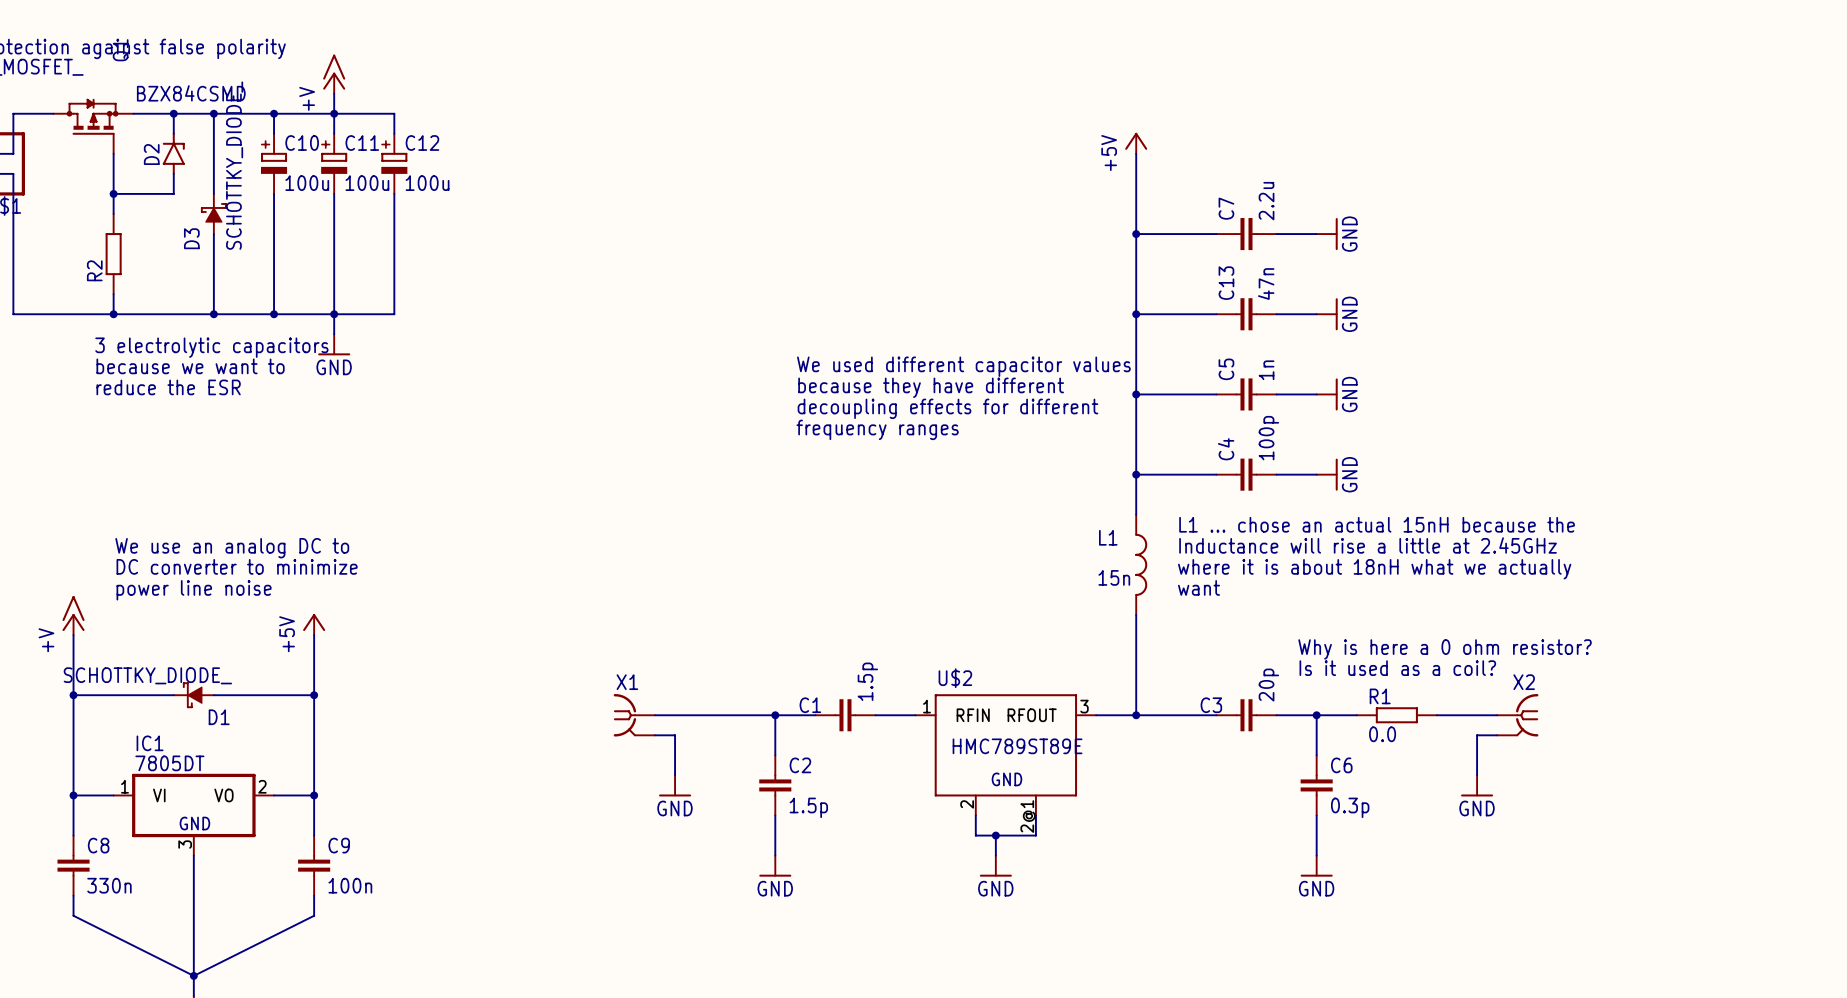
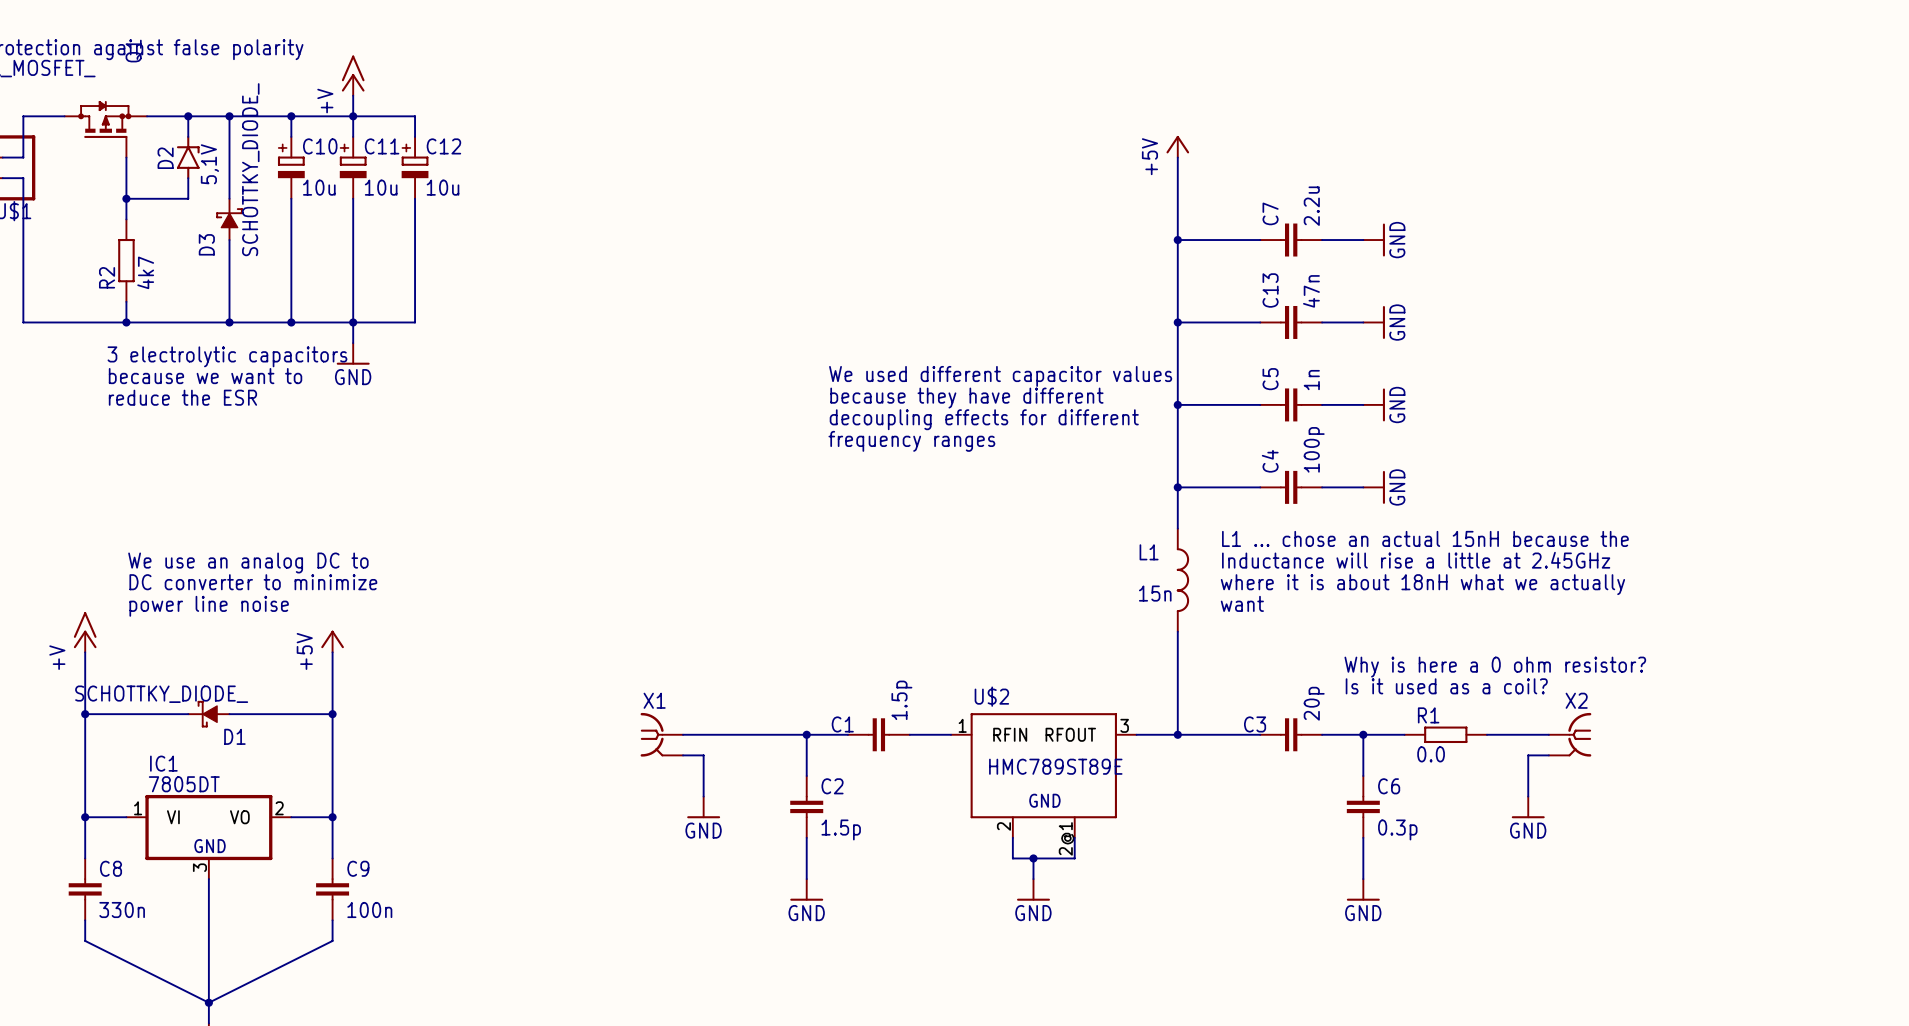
D2 value: BZX84CSMD (191, 93) -> 5,1V (209, 164)
C10 value: 100u (307, 183) -> 10u (319, 187)
C11 value: 100u (367, 183) -> 10u (381, 187)
C12 value: 100u (427, 183) -> 10u (443, 187)
R2 value: none -> 4k7 (145, 272)

